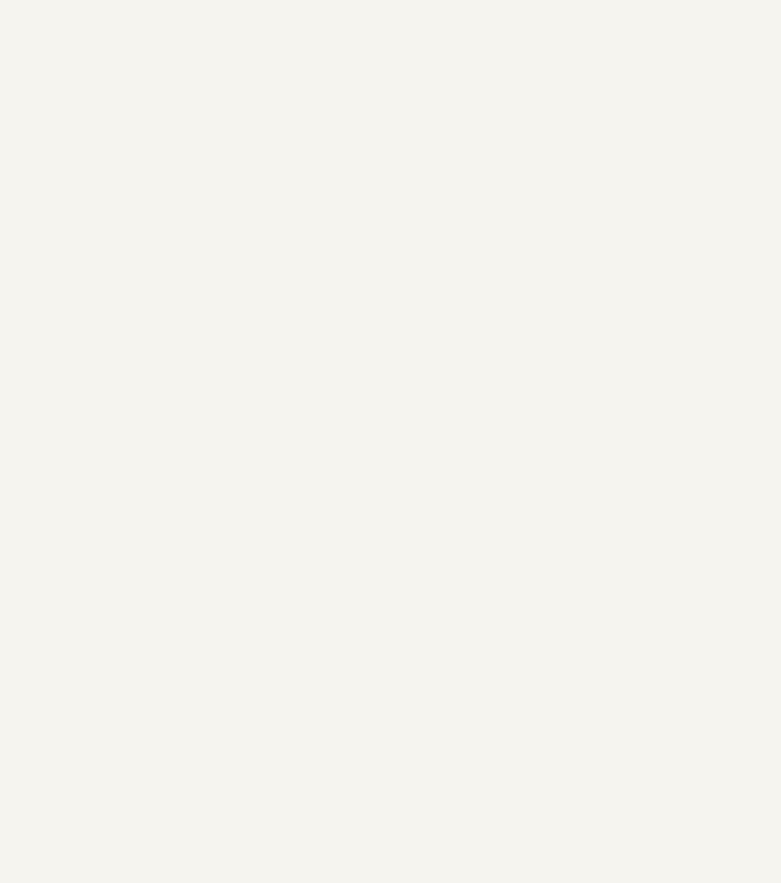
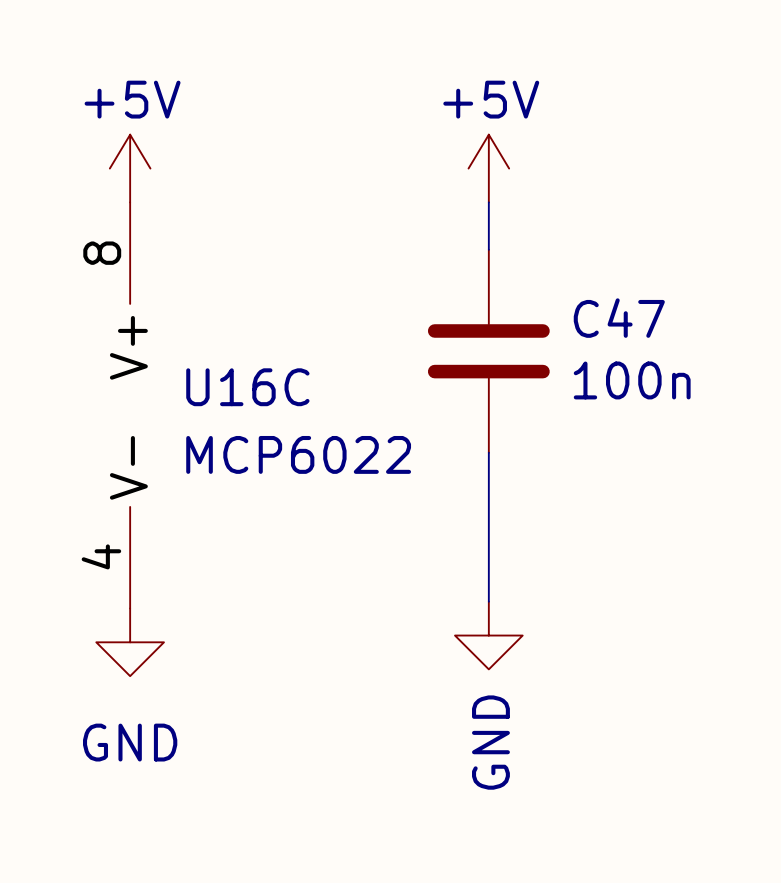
power symbol: none -> +5V (130, 168)
power symbol: none -> +5V (488, 168)
wire: none -> (488, 202) (488, 249)
C47: none -> 100n (488, 351)
U16C: none -> MCP6022 (130, 405)
wire: none -> (488, 452) (488, 601)
power symbol: none -> GND (488, 635)
power symbol: none -> GND (130, 642)

